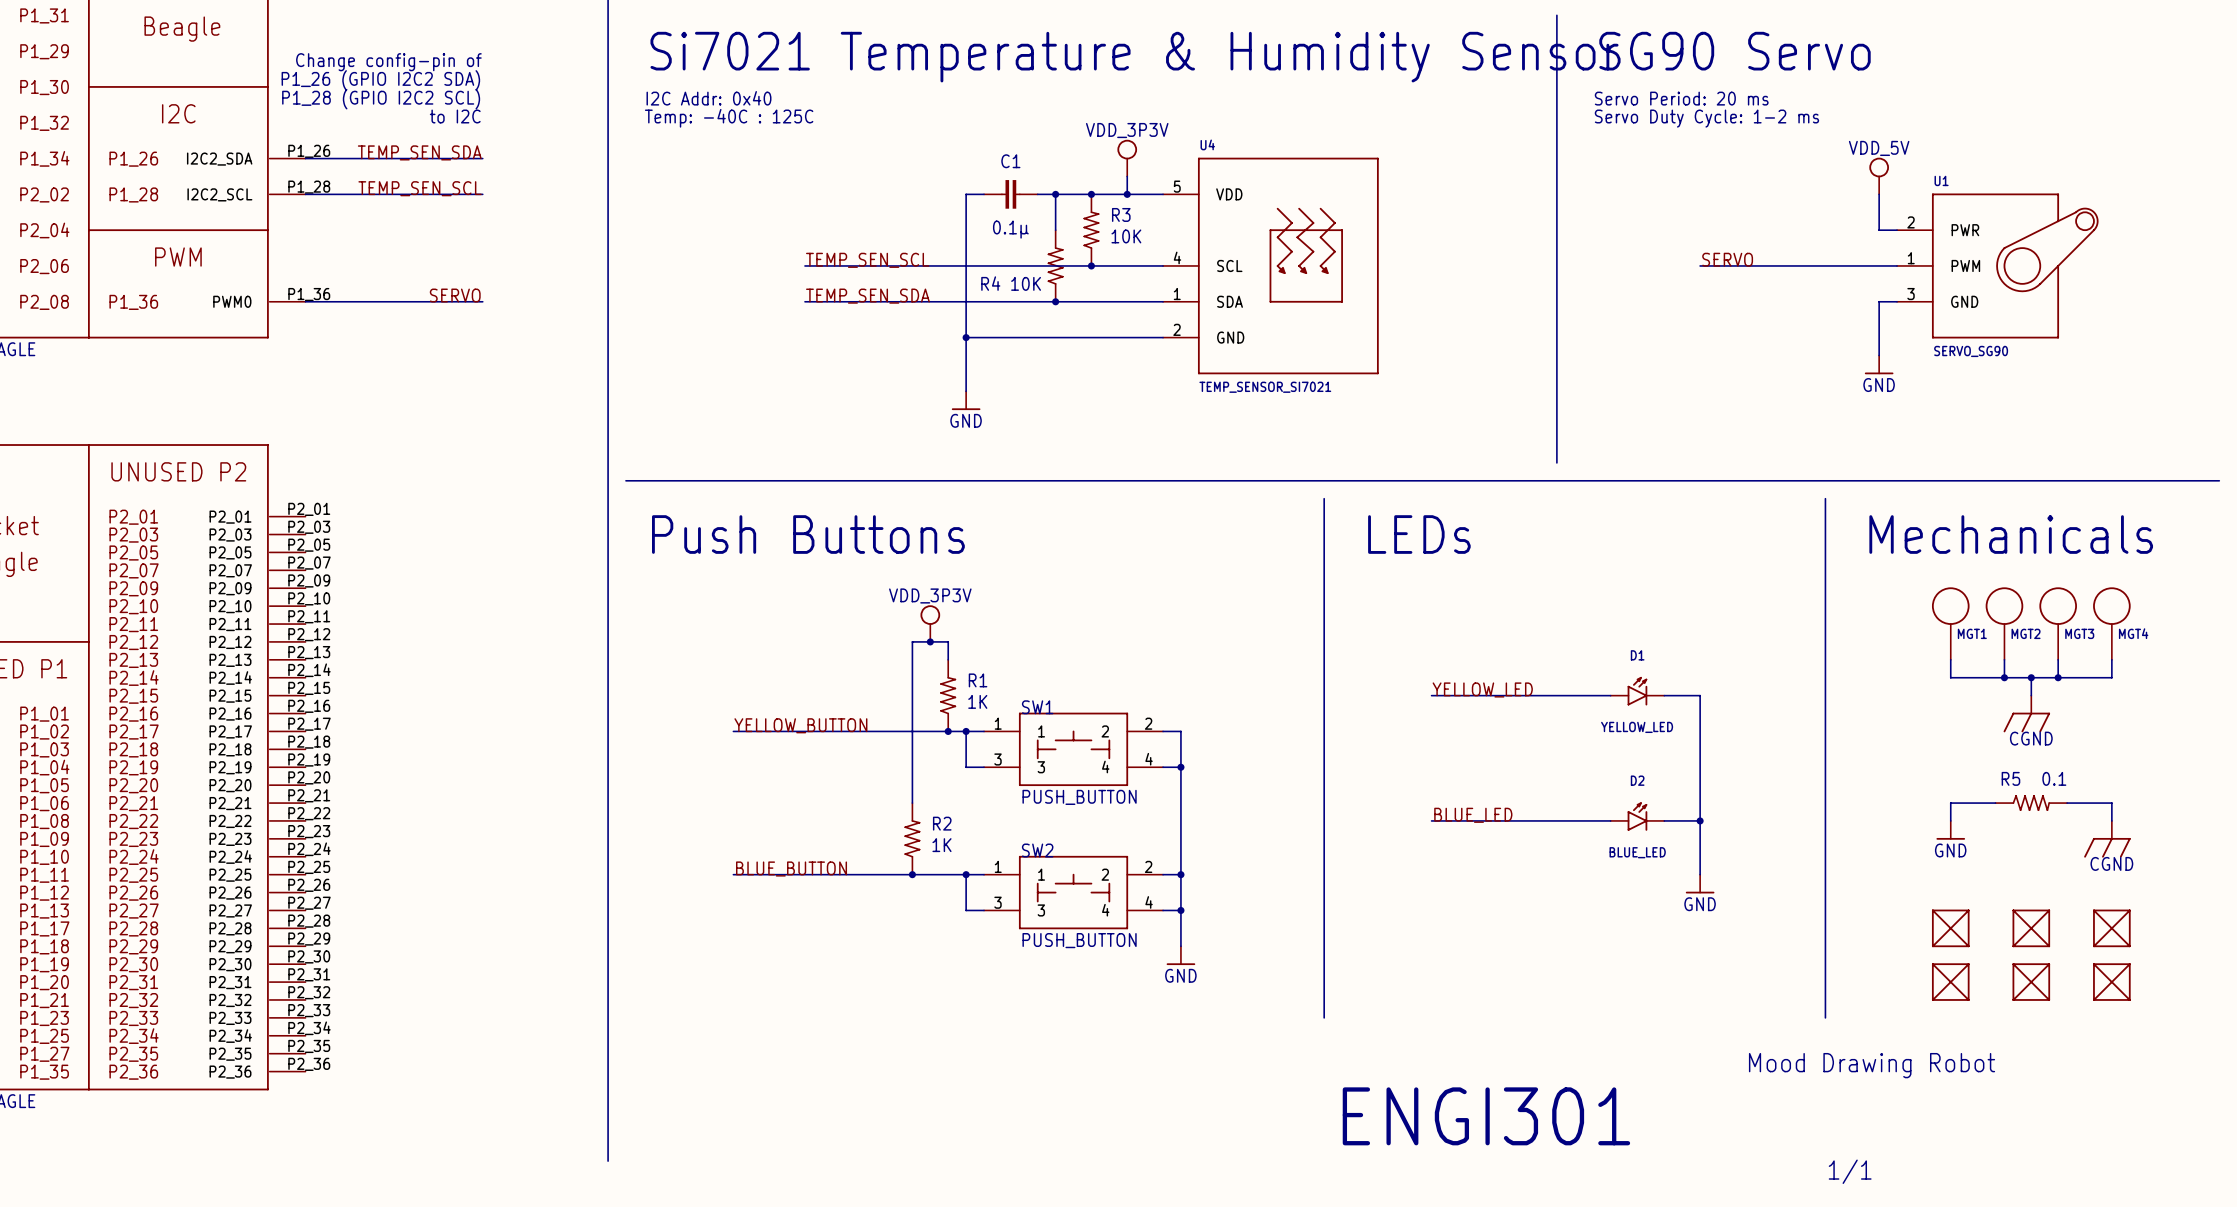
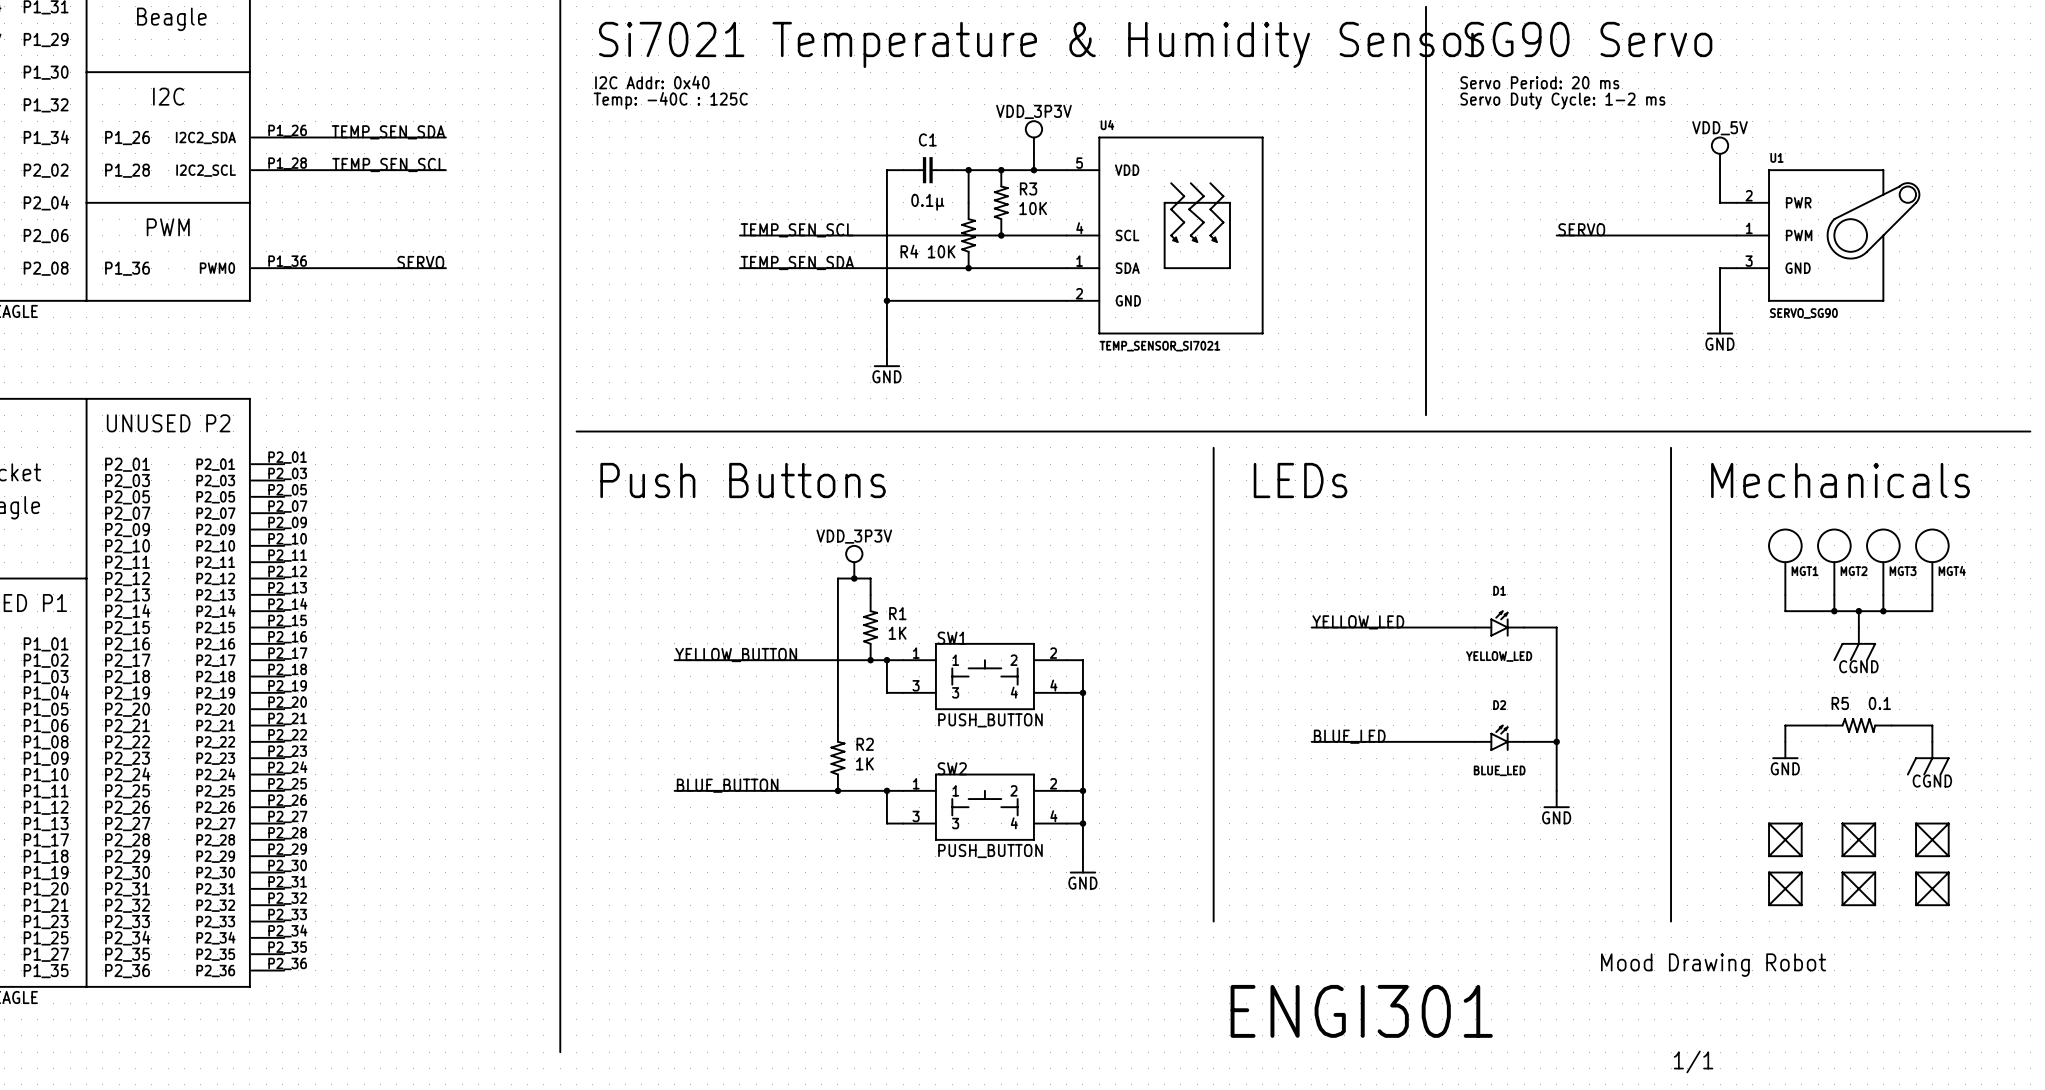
text: Change config-pin of (388, 62) -> none
text: P1_26 (GPIO I2C2 SDA) (380, 80) -> none
text: P1_28 (GPIO I2C2 SCL) (381, 99) -> none
text: to I2C (455, 116) -> none

